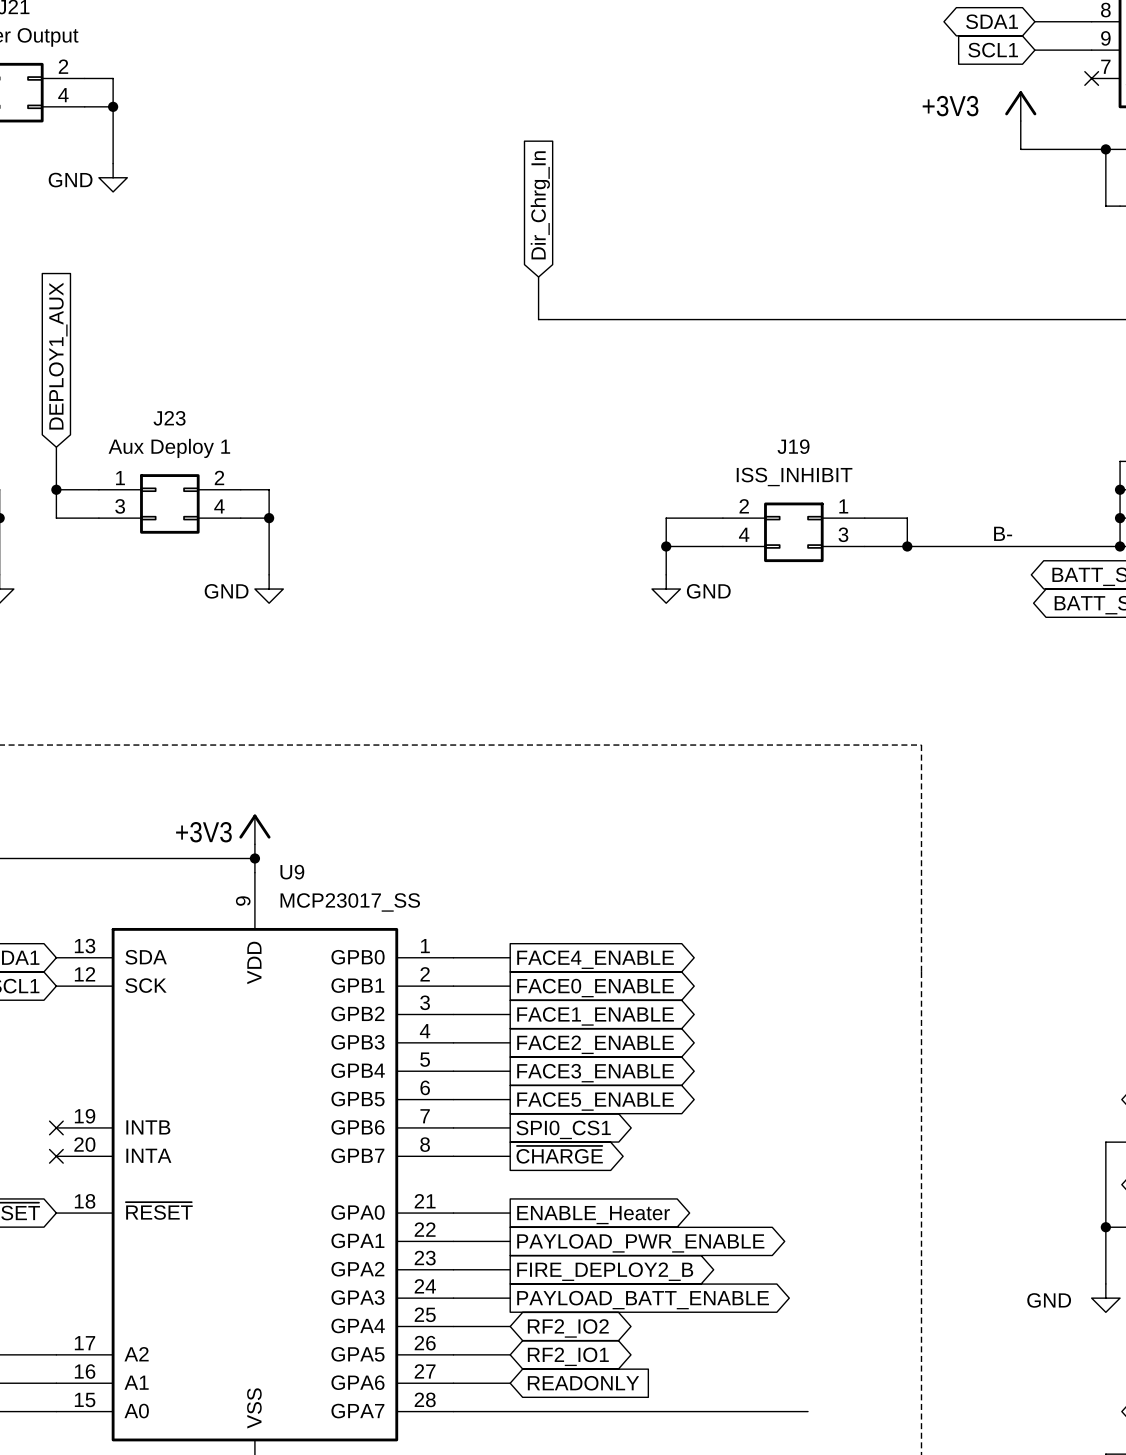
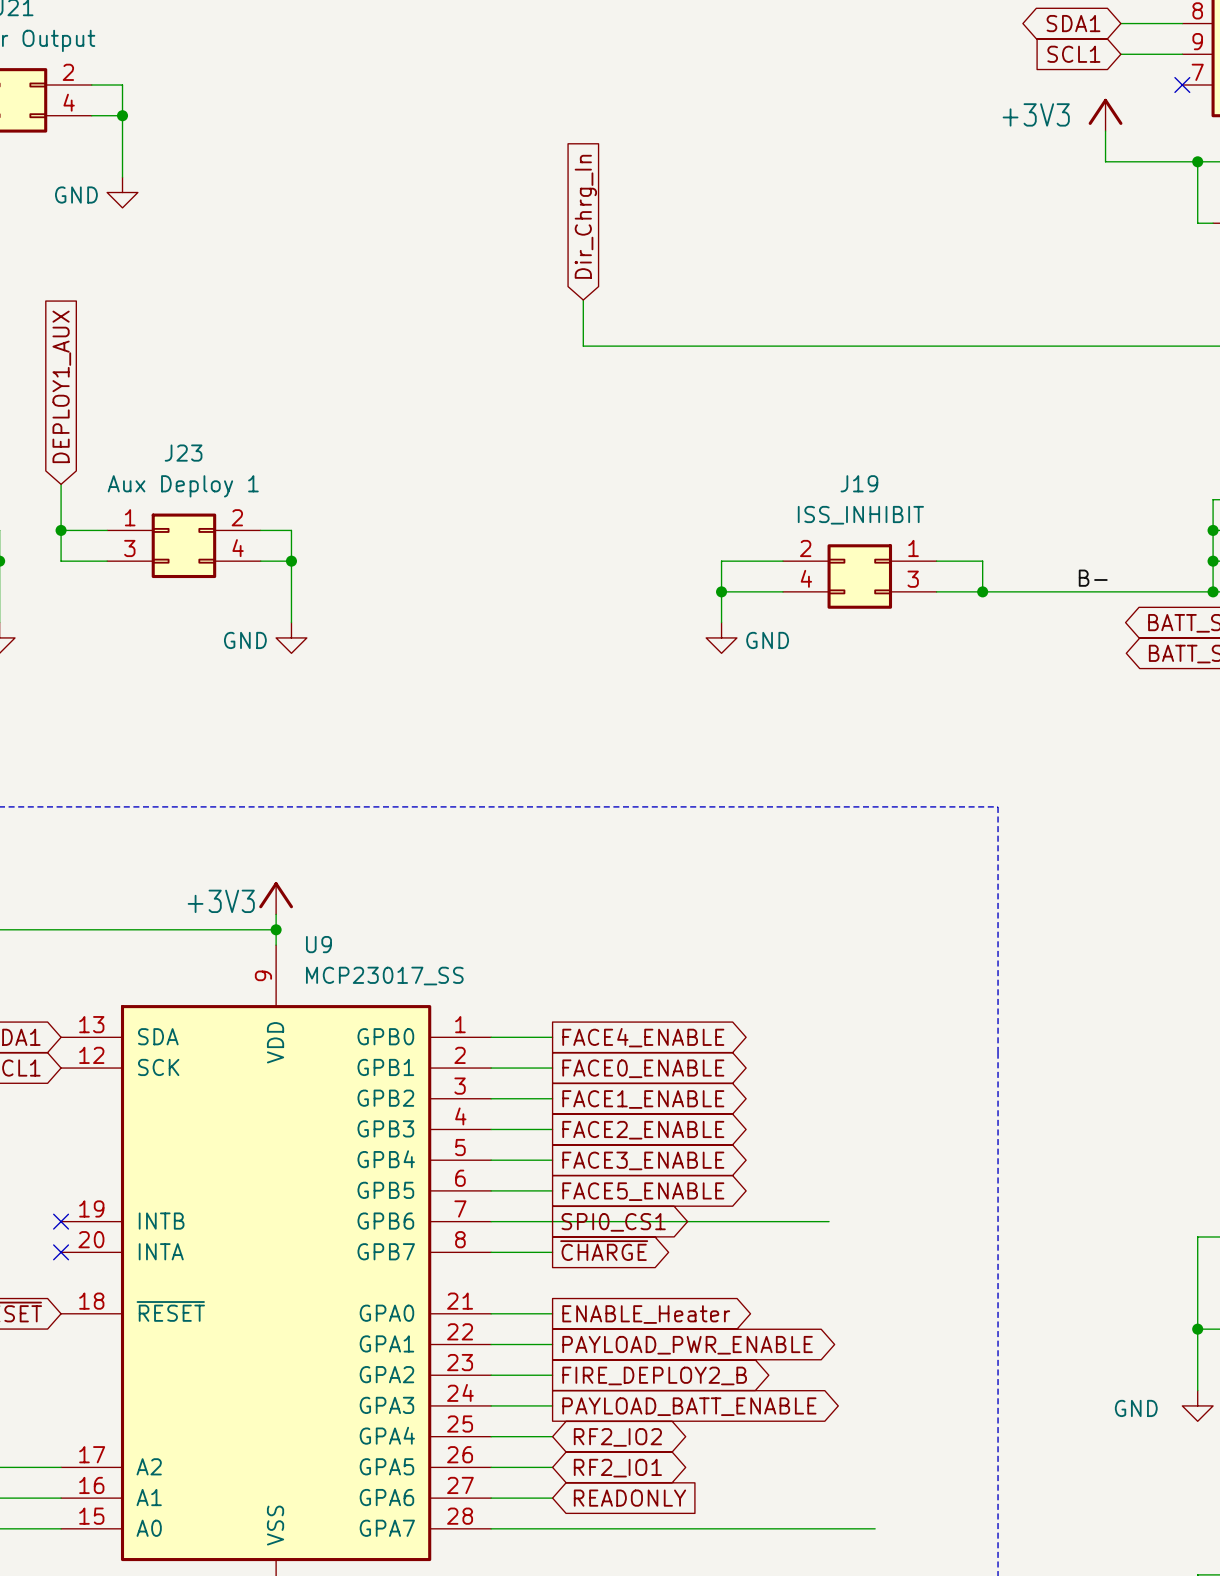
wire: none -> (552, 1221) (829, 1221)

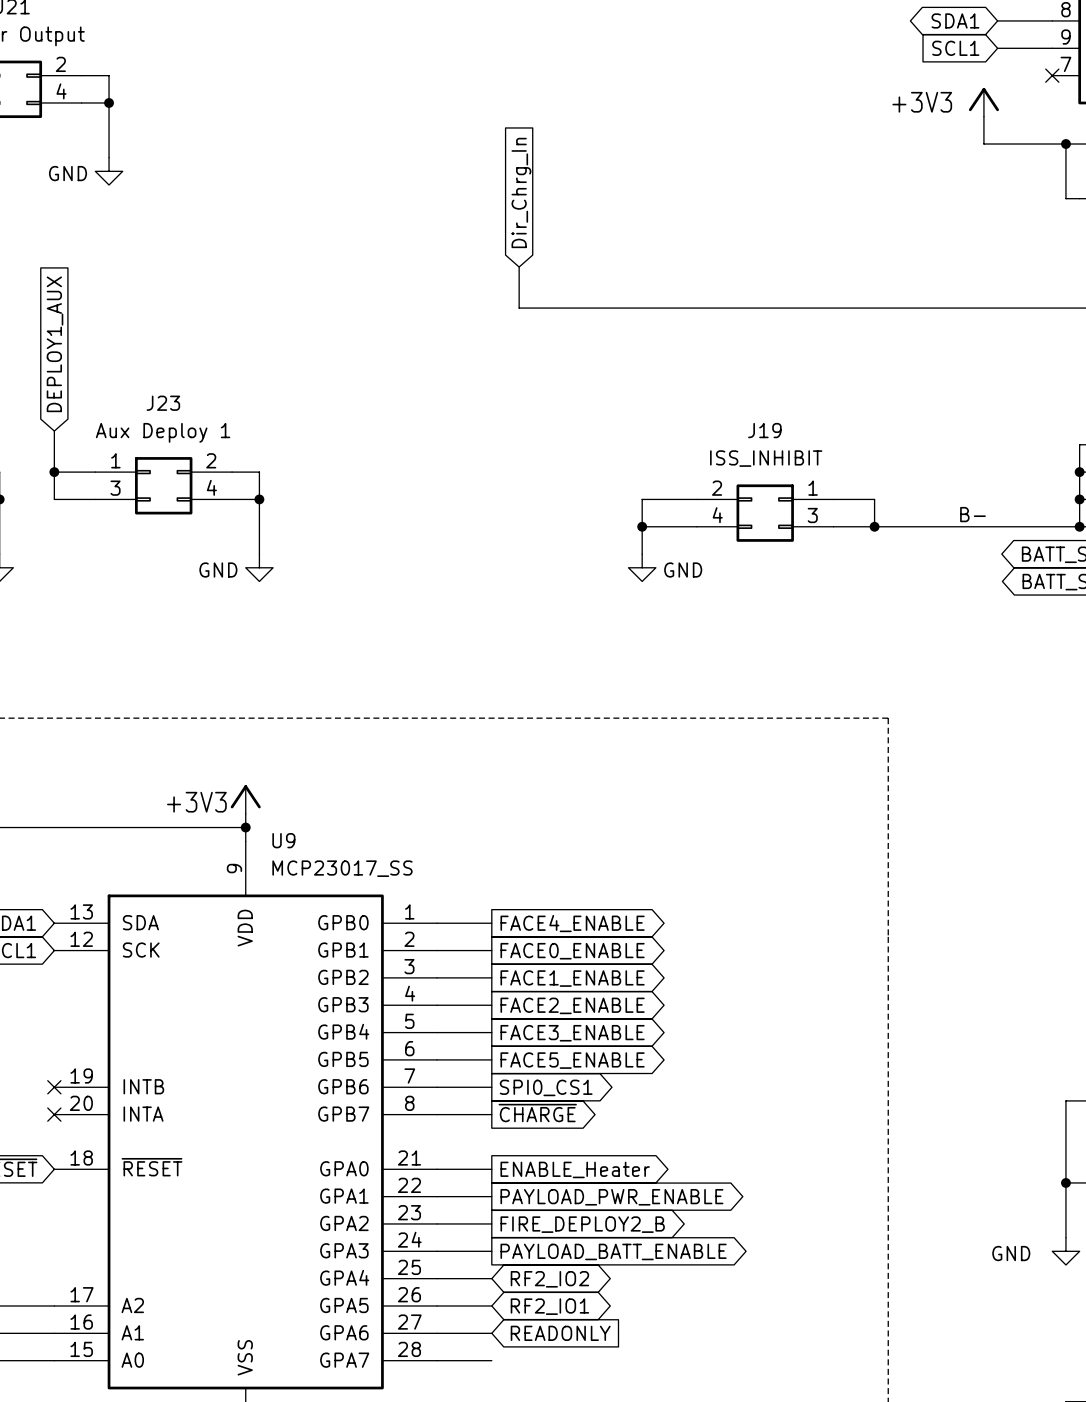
wire: (552, 1221) (829, 1221) -> none
wire: (552, 1528) (875, 1528) -> none

